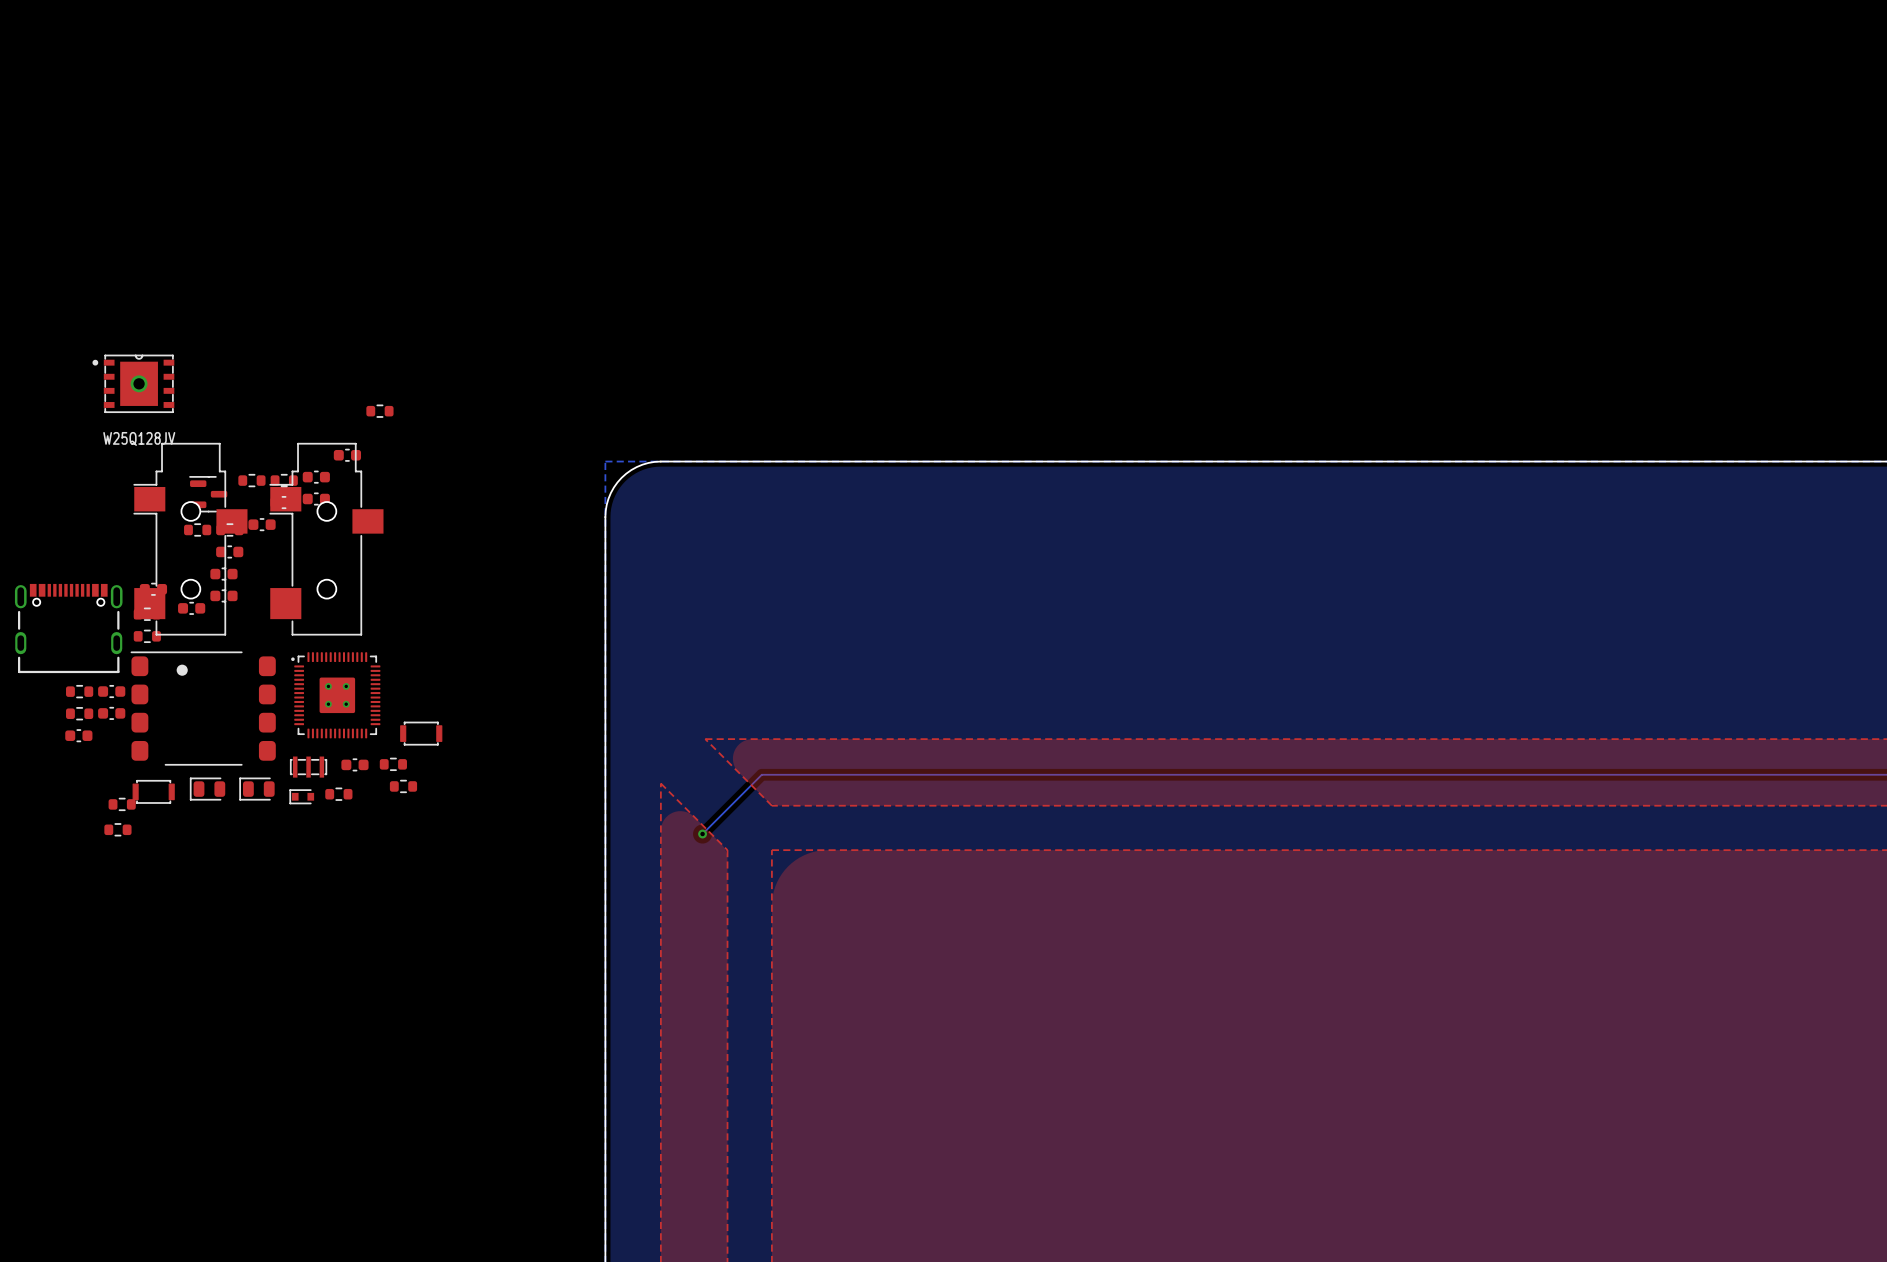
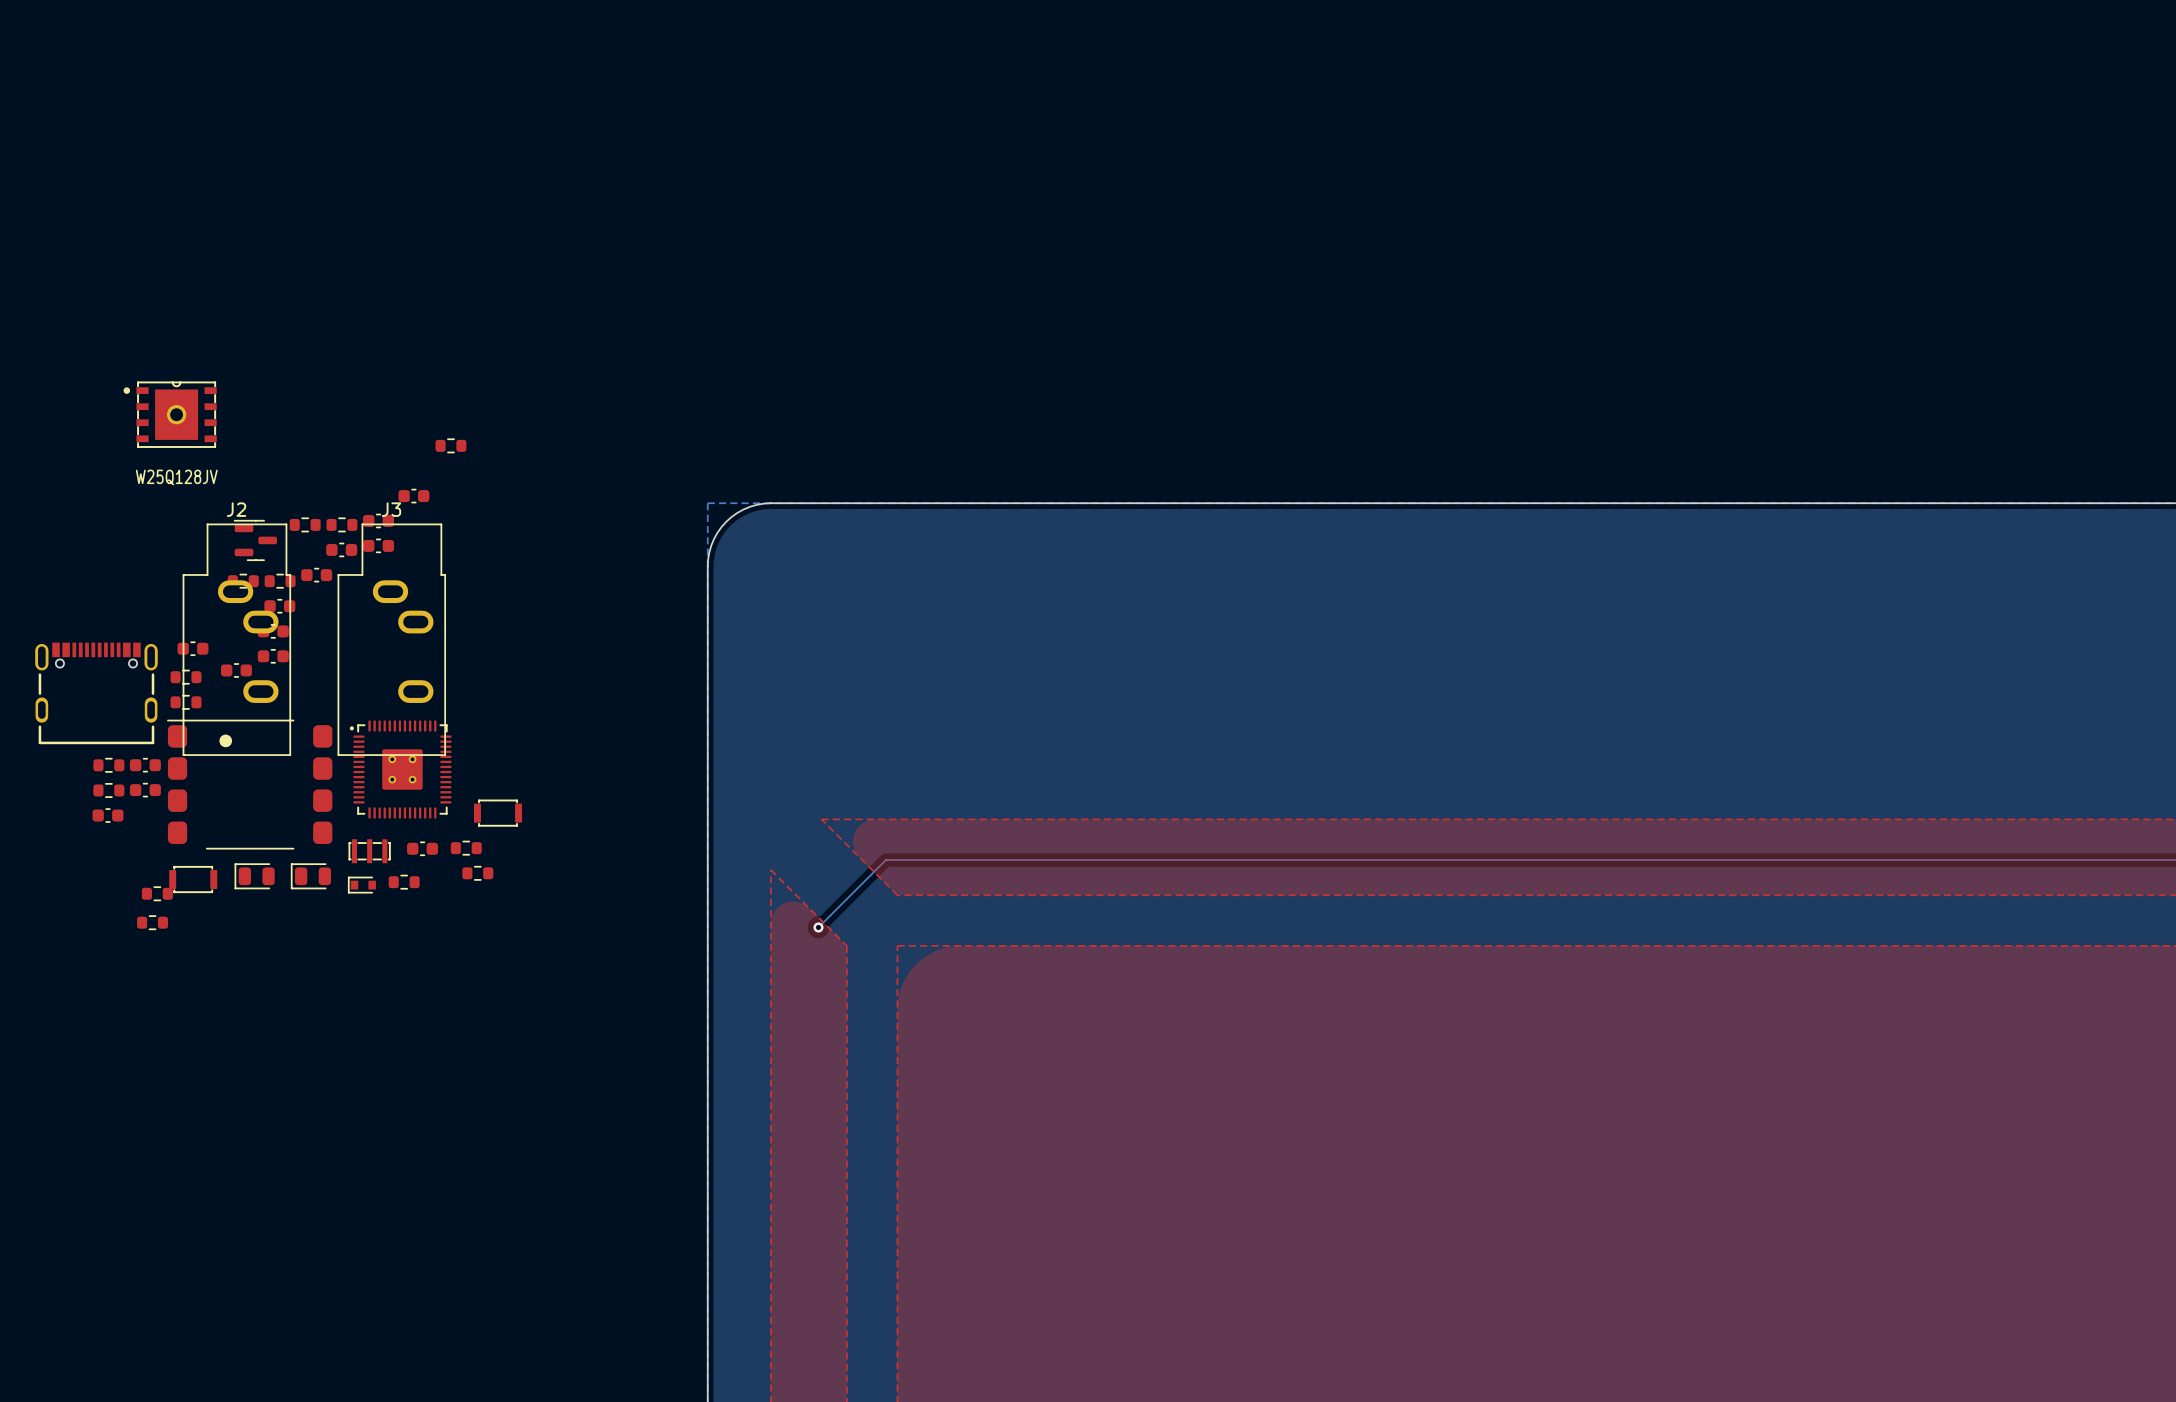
part: (190, 539) -> none
part: (326, 539) -> none
J2: none -> (236, 639)
J3: none -> (391, 639)

